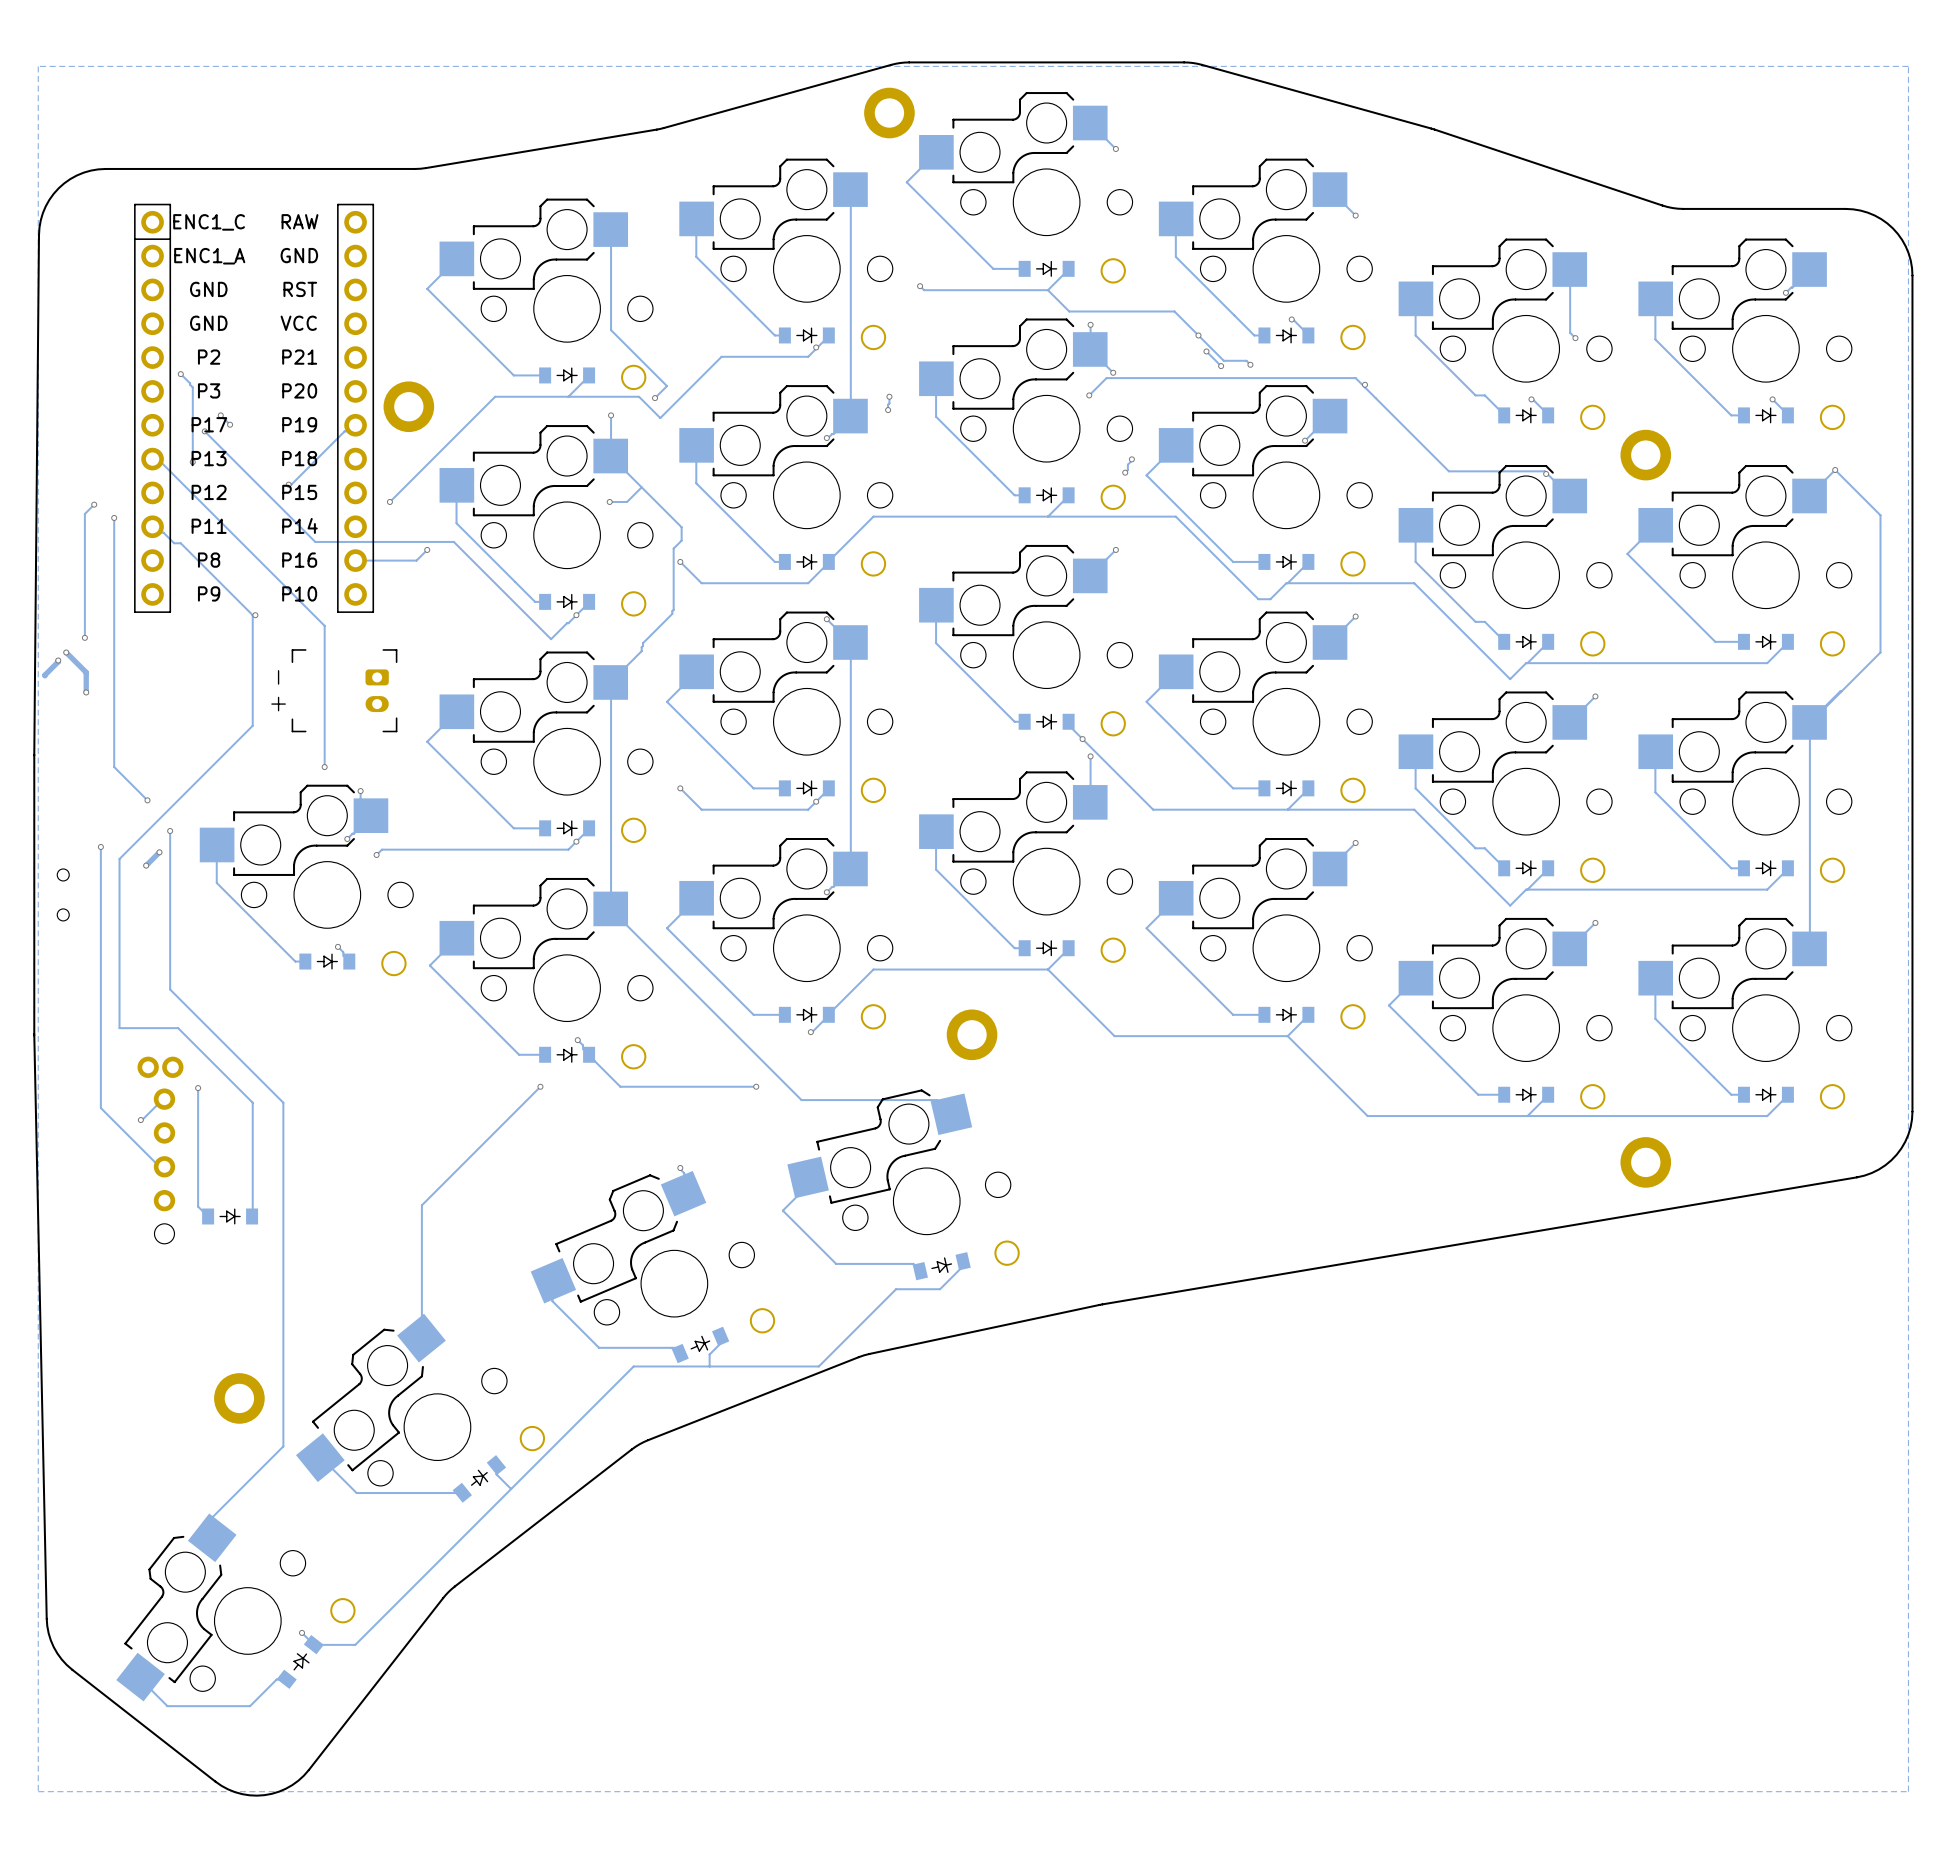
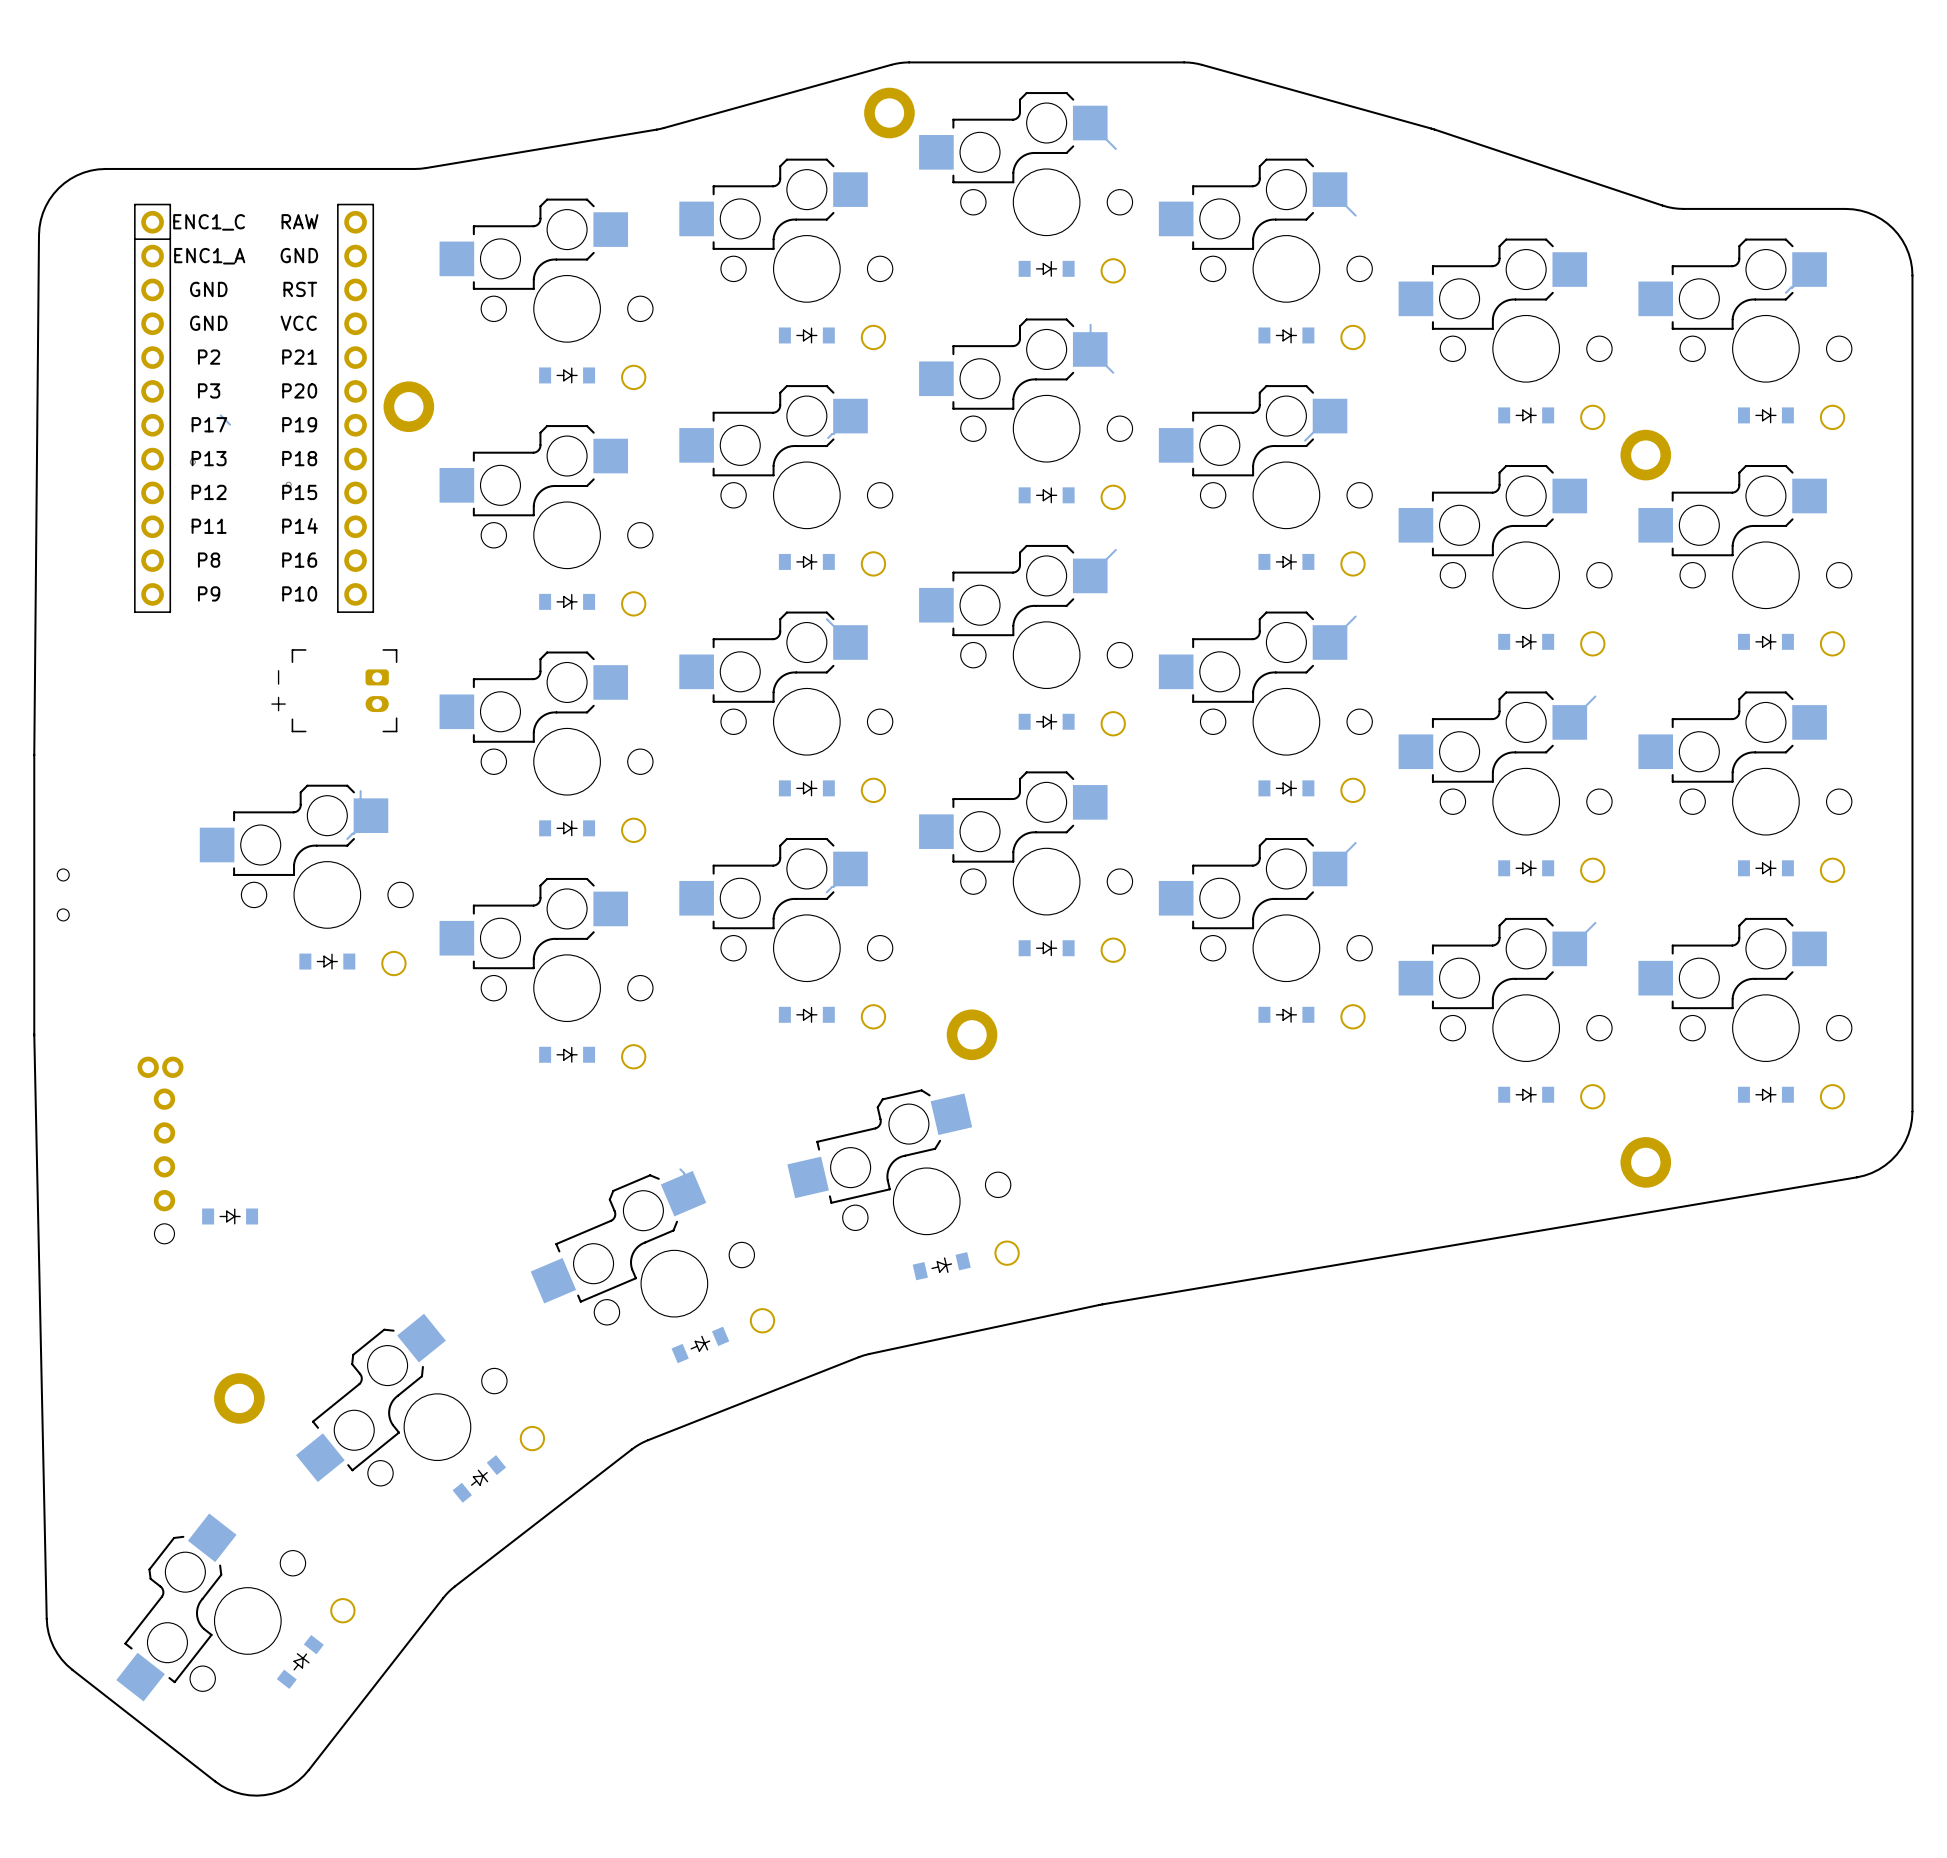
zone outline: (1908, 66) (38, 66) (38, 1791) (1908, 1791) (1908, 66) -> none
via: (1115, 148) -> none
track: (936, 152) (906, 182) (993, 268) (1025, 268) -> none
track: (850, 189) (850, 416) -> none
via: (1355, 215) -> none
track: (696, 218) (696, 256) (774, 335) (785, 335) -> none
track: (1176, 218) (1175, 256) (1254, 335) (1265, 335) -> none
track: (610, 229) (611, 330) (667, 386) (655, 398) -> none
track: (456, 258) (427, 288) (513, 375) (545, 375) -> none
track: (1068, 268) (1047, 290) -> none
track: (1569, 269) (1570, 332) (1575, 338) -> none
track: (920, 286) (924, 290) (1047, 290) -> none
via: (920, 286) -> none
track: (1047, 290) (1069, 311) (1174, 311) (1223, 360) (1246, 360) (1250, 364) -> none
via: (1785, 292) -> none
track: (1415, 298) (1415, 335) (1475, 395) (1484, 395) (1504, 415) -> none
track: (1655, 298) (1655, 339) (1731, 415) (1744, 415) -> none
via: (1291, 319) -> none
track: (1293, 319) (1308, 335) -> none
via: (1090, 324) -> none
track: (828, 335) (808, 356) (721, 356) (660, 418) (639, 396) (495, 396) (389, 501) -> none
via: (1198, 335) -> none
via: (1575, 338) -> none
via: (816, 347) -> none
track: (1206, 351) (1221, 366) -> none
via: (1206, 351) -> none
via: (1250, 364) -> none
via: (1221, 366) -> none
via: (1113, 372) -> none
track: (180, 374) (192, 387) (192, 462) -> none
via: (180, 374) -> none
track: (589, 375) (568, 396) -> none
track: (936, 378) (936, 416) (1014, 495) (1025, 495) -> none
via: (1364, 384) -> none
track: (1089, 395) (1106, 378) (1355, 378) (1448, 471) (1544, 471) (1569, 495) -> none
via: (1089, 395) -> none
track: (889, 396) (888, 410) -> none
via: (889, 396) -> none
via: (655, 398) -> none
via: (1531, 399) -> none
track: (1532, 399) (1548, 415) -> none
track: (1772, 399) (1787, 415) -> none
via: (1772, 399) -> none
via: (888, 410) -> none
via: (220, 415) -> none
track: (611, 415) (611, 456) -> none
via: (611, 415) -> none
via: (230, 424) -> none
track: (355, 424) (348, 431) (344, 431) (291, 484) (288, 484) -> none
track: (204, 431) (315, 541) (453, 541) (551, 639) (589, 601) -> none
via: (204, 431) -> none
via: (826, 438) -> none
via: (1305, 440) -> none
track: (696, 445) (696, 483) (774, 561) (785, 561) -> none
track: (1176, 445) (1146, 475) (1233, 561) (1265, 561) -> none
track: (611, 456) (681, 527) (681, 540) (673, 548) (672, 613) (643, 643) (641, 651) (611, 681) (611, 909) -> none
track: (158, 459) (324, 625) (324, 767) -> none
via: (1131, 459) -> none
track: (1131, 460) (1127, 464) (1127, 470) (1125, 472) -> none
via: (1835, 470) -> none
via: (1125, 472) -> none
via: (1546, 474) -> none
track: (456, 485) (456, 523) (535, 601) (545, 601) -> none
track: (641, 487) (627, 501) (609, 501) -> none
track: (1068, 495) (1047, 516) -> none
track: (1809, 495) (1835, 470) (1880, 515) (1880, 652) (1809, 722) -> none
via: (389, 501) -> none
via: (609, 501) -> none
track: (94, 504) (84, 513) (84, 637) -> none
via: (94, 504) -> none
track: (114, 517) (114, 767) (147, 800) -> none
via: (114, 517) -> none
track: (1415, 525) (1415, 561) (1475, 621) (1484, 621) (1504, 641) -> none
track: (1655, 525) (1627, 553) (1715, 641) (1744, 641) -> none
track: (152, 527) (158, 532) (163, 532) (174, 543) (180, 543) (252, 615) -> none
track: (427, 549) (416, 560) (359, 560) -> none
via: (427, 549) -> none
via: (1115, 549) -> none
via: (680, 561) -> none
track: (828, 561) (808, 583) (701, 583) (680, 561) -> none
track: (828, 561) (873, 516) (1175, 516) (1258, 599) (1270, 599) (1286, 583) (1414, 583) (1510, 679) (1526, 663) (1767, 663) (1787, 641) -> none
track: (1308, 561) (1287, 583) -> none
track: (936, 605) (936, 643) (1014, 721) (1025, 721) -> none
track: (252, 615) (252, 725) (119, 858) (119, 1028) (178, 1028) (252, 1102) (252, 1216) -> none
via: (255, 615) -> none
via: (576, 615) -> none
via: (1355, 616) -> none
via: (826, 619) -> none
via: (84, 637) -> none
track: (1548, 641) (1527, 663) -> none
track: (850, 642) (850, 868) -> none
track: (66, 652) (86, 672) (86, 692) -> none
via: (66, 652) -> none
track: (58, 660) (44, 675) -> none
via: (58, 660) -> none
track: (696, 671) (667, 701) (753, 788) (785, 788) -> none
track: (1176, 671) (1146, 701) (1233, 788) (1265, 788) -> none
track: (1841, 691) (1809, 721) (1809, 948) -> none
via: (86, 692) -> none
via: (1595, 696) -> none
track: (456, 711) (427, 741) (513, 828) (545, 828) -> none
track: (1068, 721) (1067, 724) (1153, 809) (1414, 809) (1510, 905) (1526, 889) (1767, 889) (1787, 868) -> none
via: (1082, 739) -> none
track: (1415, 751) (1415, 788) (1475, 848) (1484, 848) (1504, 868) -> none
track: (1655, 751) (1655, 792) (1731, 868) (1744, 868) -> none
track: (1090, 756) (1090, 802) -> none
via: (1090, 756) -> none
via: (324, 767) -> none
via: (680, 788) -> none
track: (828, 788) (808, 809) (701, 809) (680, 788) -> none
track: (1308, 788) (1287, 809) -> none
via: (360, 791) -> none
via: (147, 800) -> none
via: (816, 801) -> none
track: (589, 828) (568, 849) (381, 849) (376, 854) -> none
track: (170, 831) (170, 989) (283, 1102) (283, 1446) (212, 1517) (212, 1537) -> none
via: (170, 831) -> none
track: (936, 831) (936, 869) (1014, 948) (1025, 948) -> none
via: (347, 838) -> none
via: (576, 841) -> none
via: (1355, 842) -> none
track: (217, 844) (216, 882) (295, 961) (306, 961) -> none
track: (100, 846) (100, 1108) (159, 1166) -> none
via: (100, 846) -> none
track: (159, 852) (146, 865) -> none
via: (159, 852) -> none
via: (376, 854) -> none
via: (146, 865) -> none
track: (1548, 868) (1527, 889) -> none
via: (826, 892) -> none
track: (696, 898) (667, 928) (753, 1014) (785, 1014) -> none
track: (1176, 898) (1146, 928) (1233, 1014) (1265, 1014) -> none
track: (611, 909) (801, 1100) (937, 1100) (951, 1114) -> none
via: (1595, 922) -> none
track: (456, 938) (429, 965) (519, 1054) (545, 1054) -> none
track: (337, 946) (343, 952) (343, 956) -> none
via: (337, 946) -> none
track: (1068, 948) (1047, 969) -> none
track: (1047, 969) (1114, 1036) (1287, 1036) -> none
track: (1047, 969) (873, 969) (828, 1014) -> none
track: (1415, 978) (1388, 1005) (1478, 1094) (1504, 1094) -> none
track: (1655, 978) (1655, 1018) (1731, 1094) (1744, 1094) -> none
track: (828, 1014) (812, 1032) -> none
track: (1308, 1014) (1287, 1036) -> none
via: (810, 1032) -> none
track: (1287, 1036) (1367, 1116) (1767, 1116) (1787, 1094) -> none
track: (577, 1040) (583, 1045) (583, 1049) -> none
via: (577, 1040) -> none
track: (589, 1054) (620, 1086) (756, 1086) -> none
track: (540, 1086) (421, 1205) (421, 1338) -> none
via: (540, 1086) -> none
via: (756, 1086) -> none
track: (198, 1088) (198, 1206) (208, 1216) -> none
via: (198, 1088) -> none
track: (1548, 1094) (1527, 1116) -> none
track: (163, 1098) (142, 1120) -> none
via: (140, 1120) -> none
via: (680, 1168) -> none
track: (808, 1177) (808, 1185) (782, 1210) (836, 1263) (913, 1263) (920, 1271) -> none
track: (963, 1261) (962, 1266) (940, 1289) (896, 1289) (818, 1366) (633, 1366) (355, 1644) (314, 1644) (302, 1632) -> none
track: (553, 1280) (552, 1301) (599, 1347) (674, 1347) (680, 1353) -> none
track: (720, 1336) (720, 1343) (709, 1354) (709, 1366) -> none
track: (320, 1457) (356, 1493) (462, 1492) -> none
track: (496, 1465) (496, 1474) (511, 1489) -> none
via: (302, 1632) -> none
track: (140, 1676) (140, 1679) (167, 1706) (250, 1706) (276, 1679) (286, 1679) -> none

